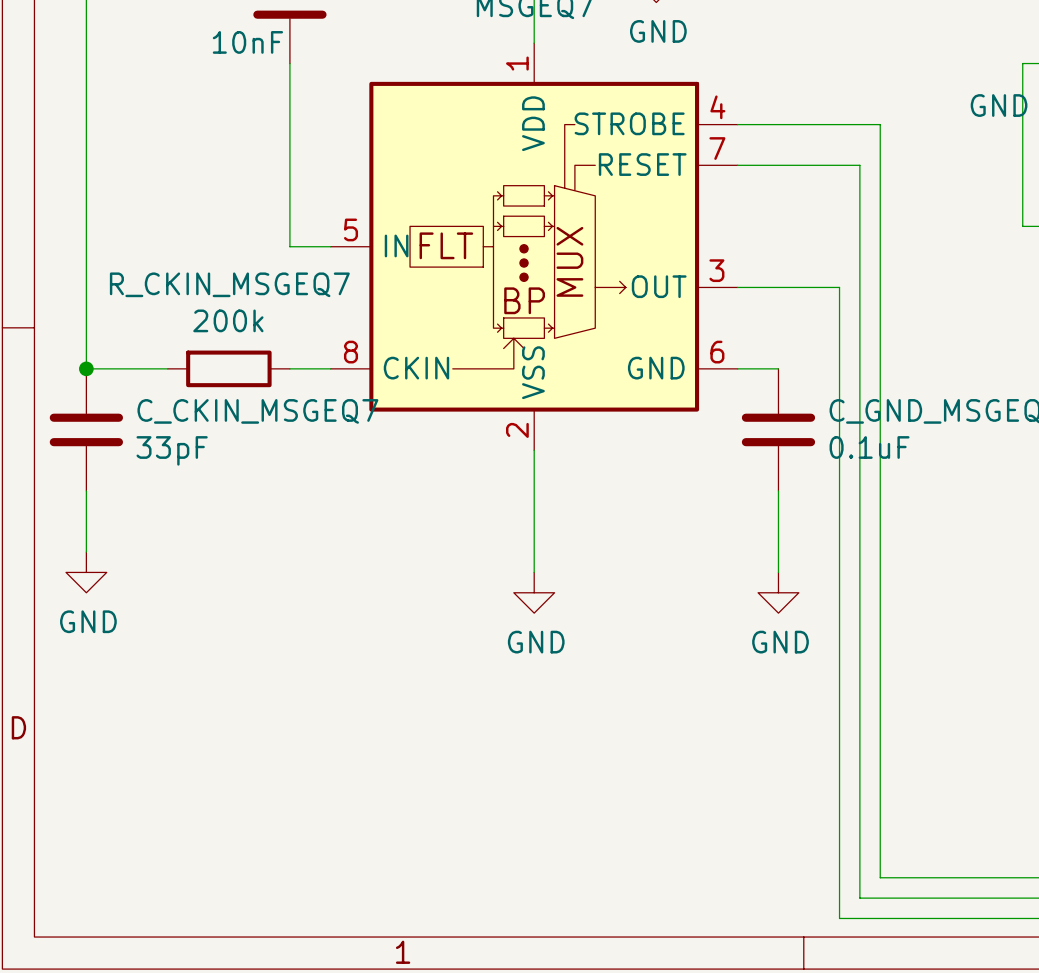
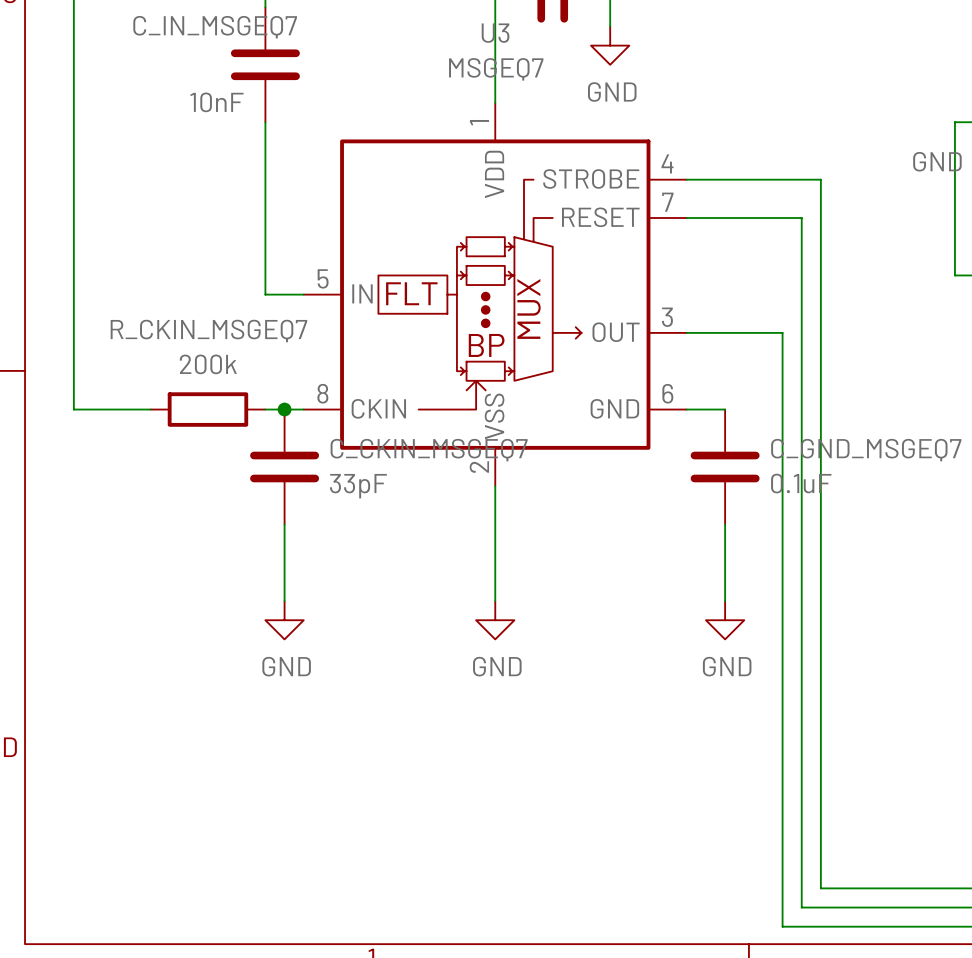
junction: (86, 368) -> none
junction: none -> (284, 409)
C_CKIN_MSGEQ7 position: (86, 429) -> (284, 467)
wire: (86, 491) (86, 552) -> none
wire: none -> (284, 524) (284, 601)
power symbol position: GND (86, 572) -> GND (284, 620)

